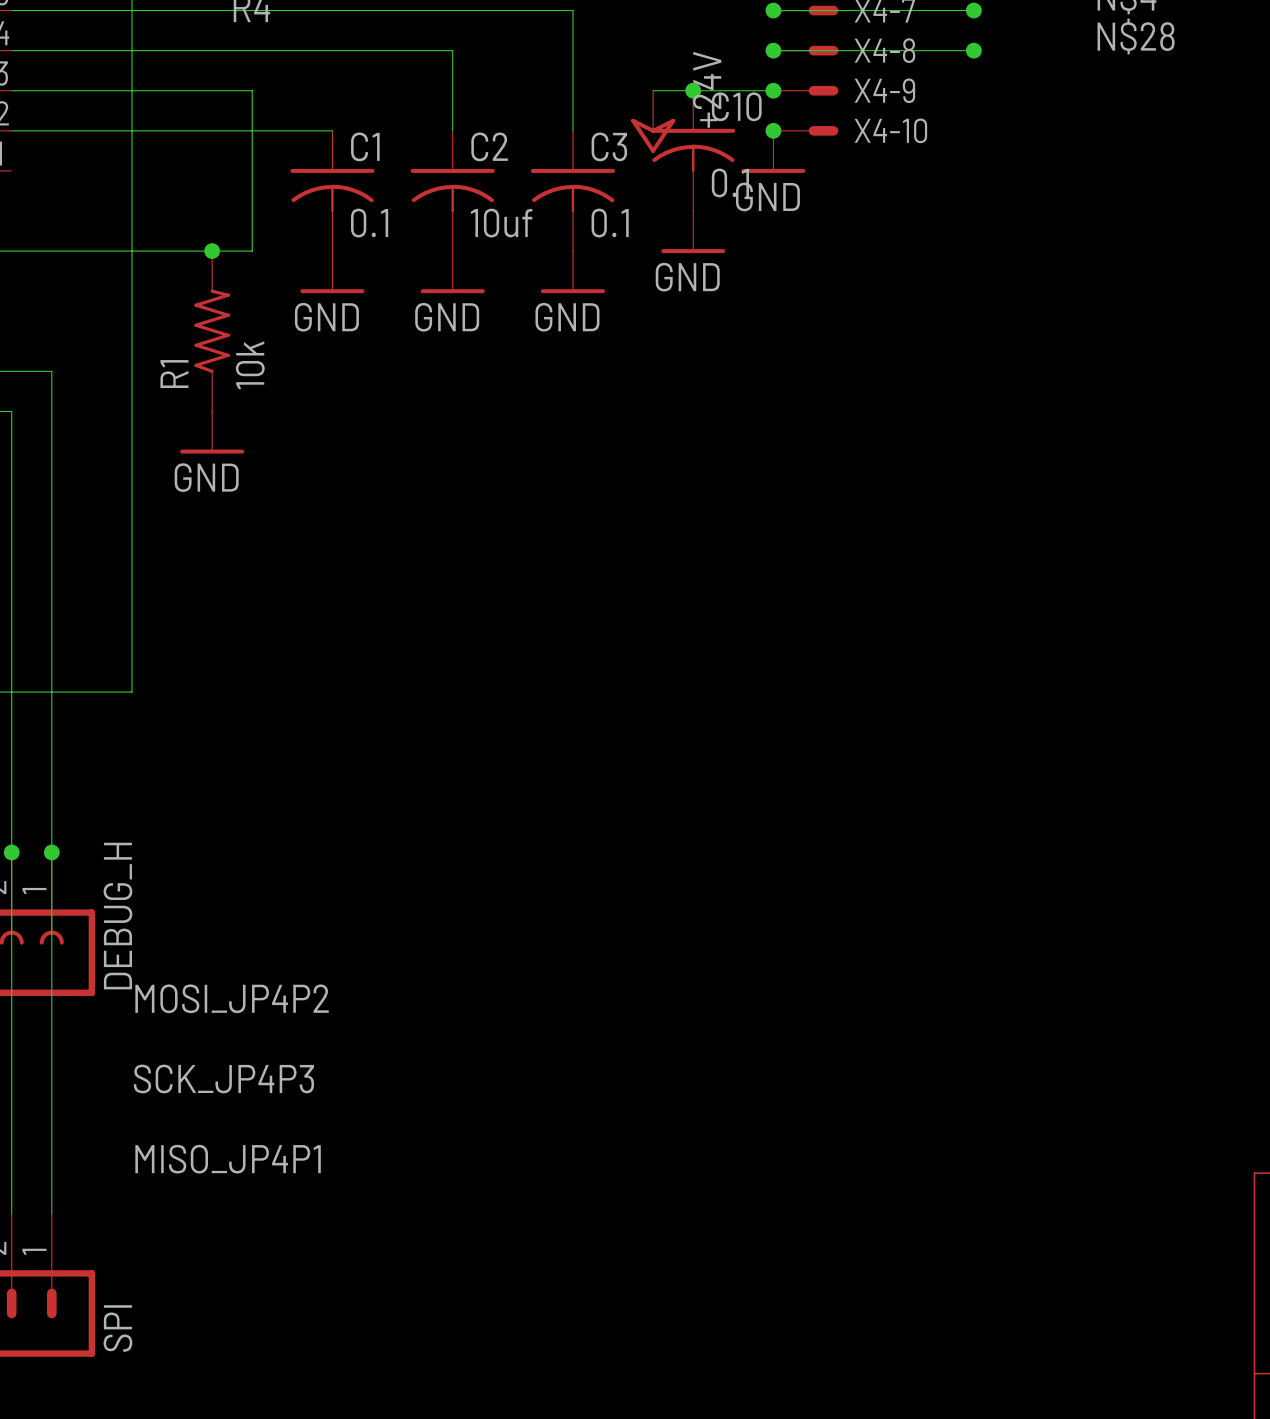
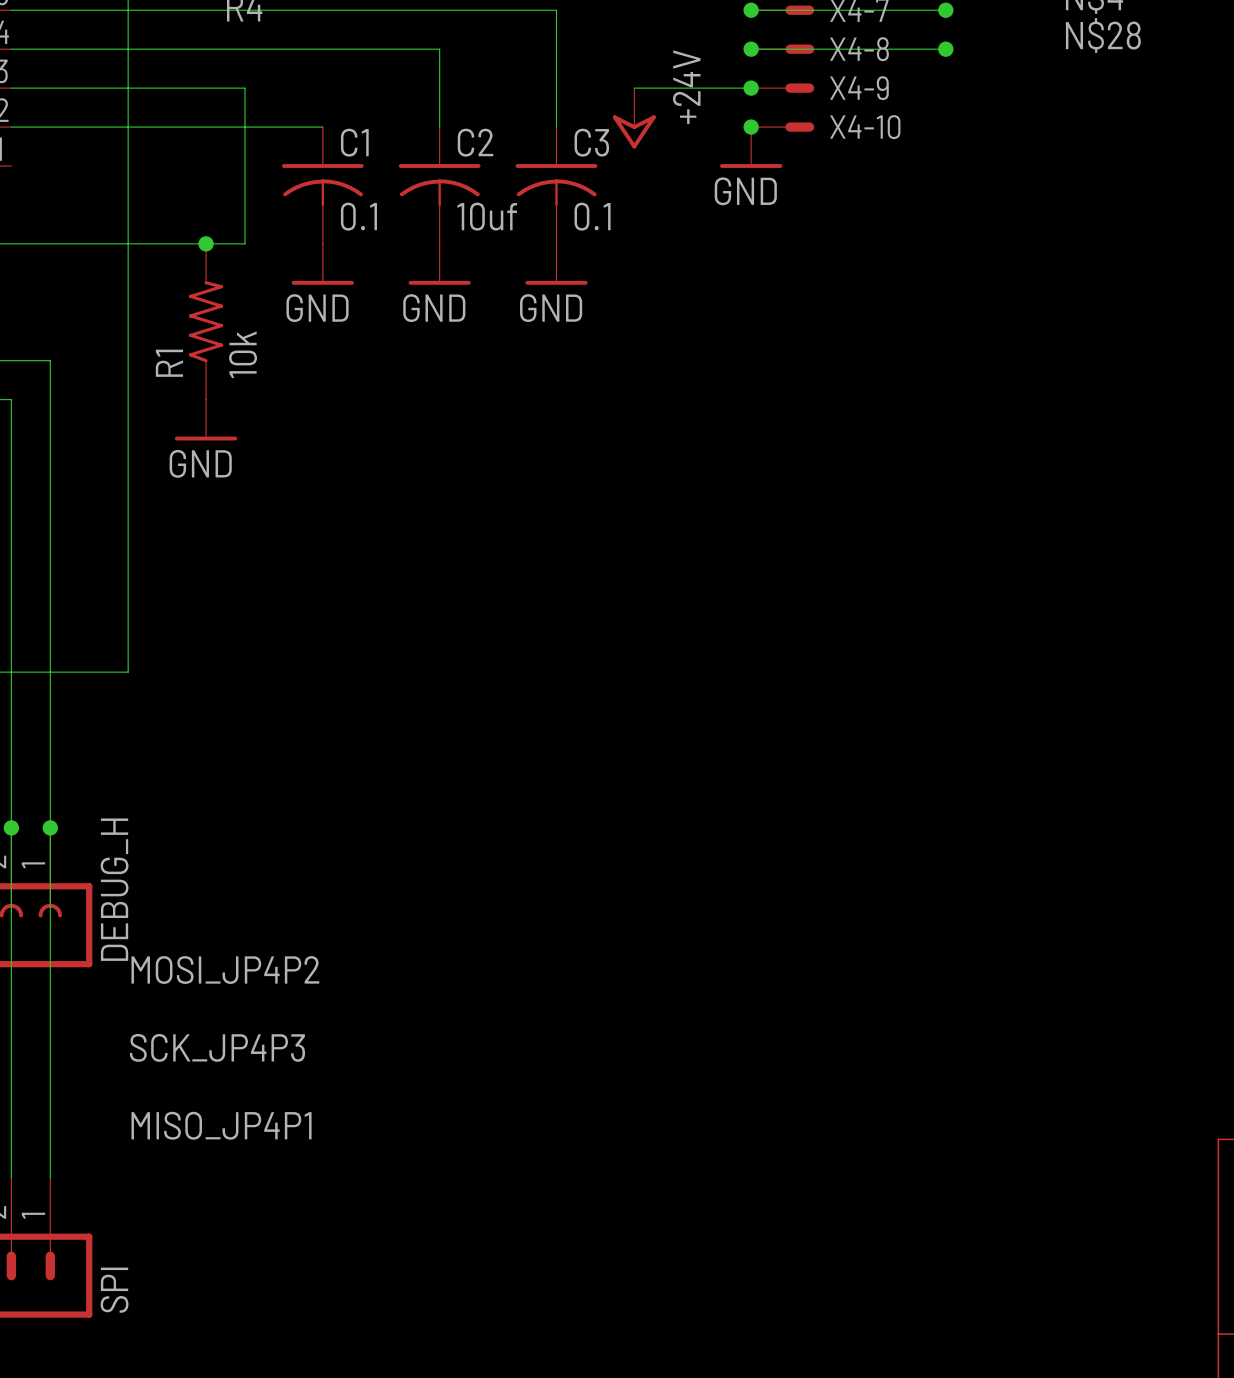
junction: (693, 90) -> none
C10: 0.1 (693, 150) -> none
power symbol: GND (693, 232) -> none

